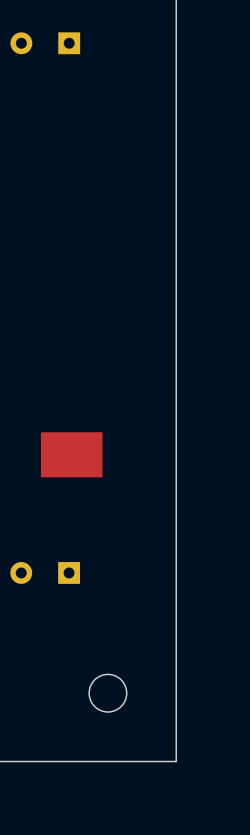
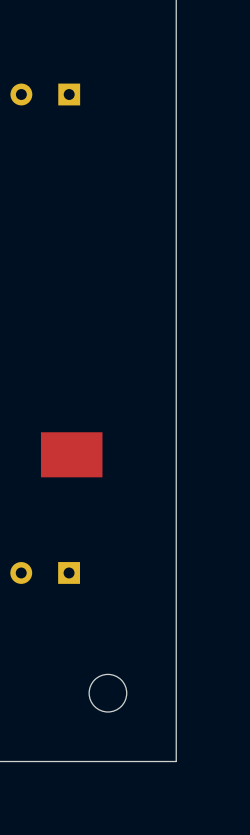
part position: (45, 43) -> (45, 94)

